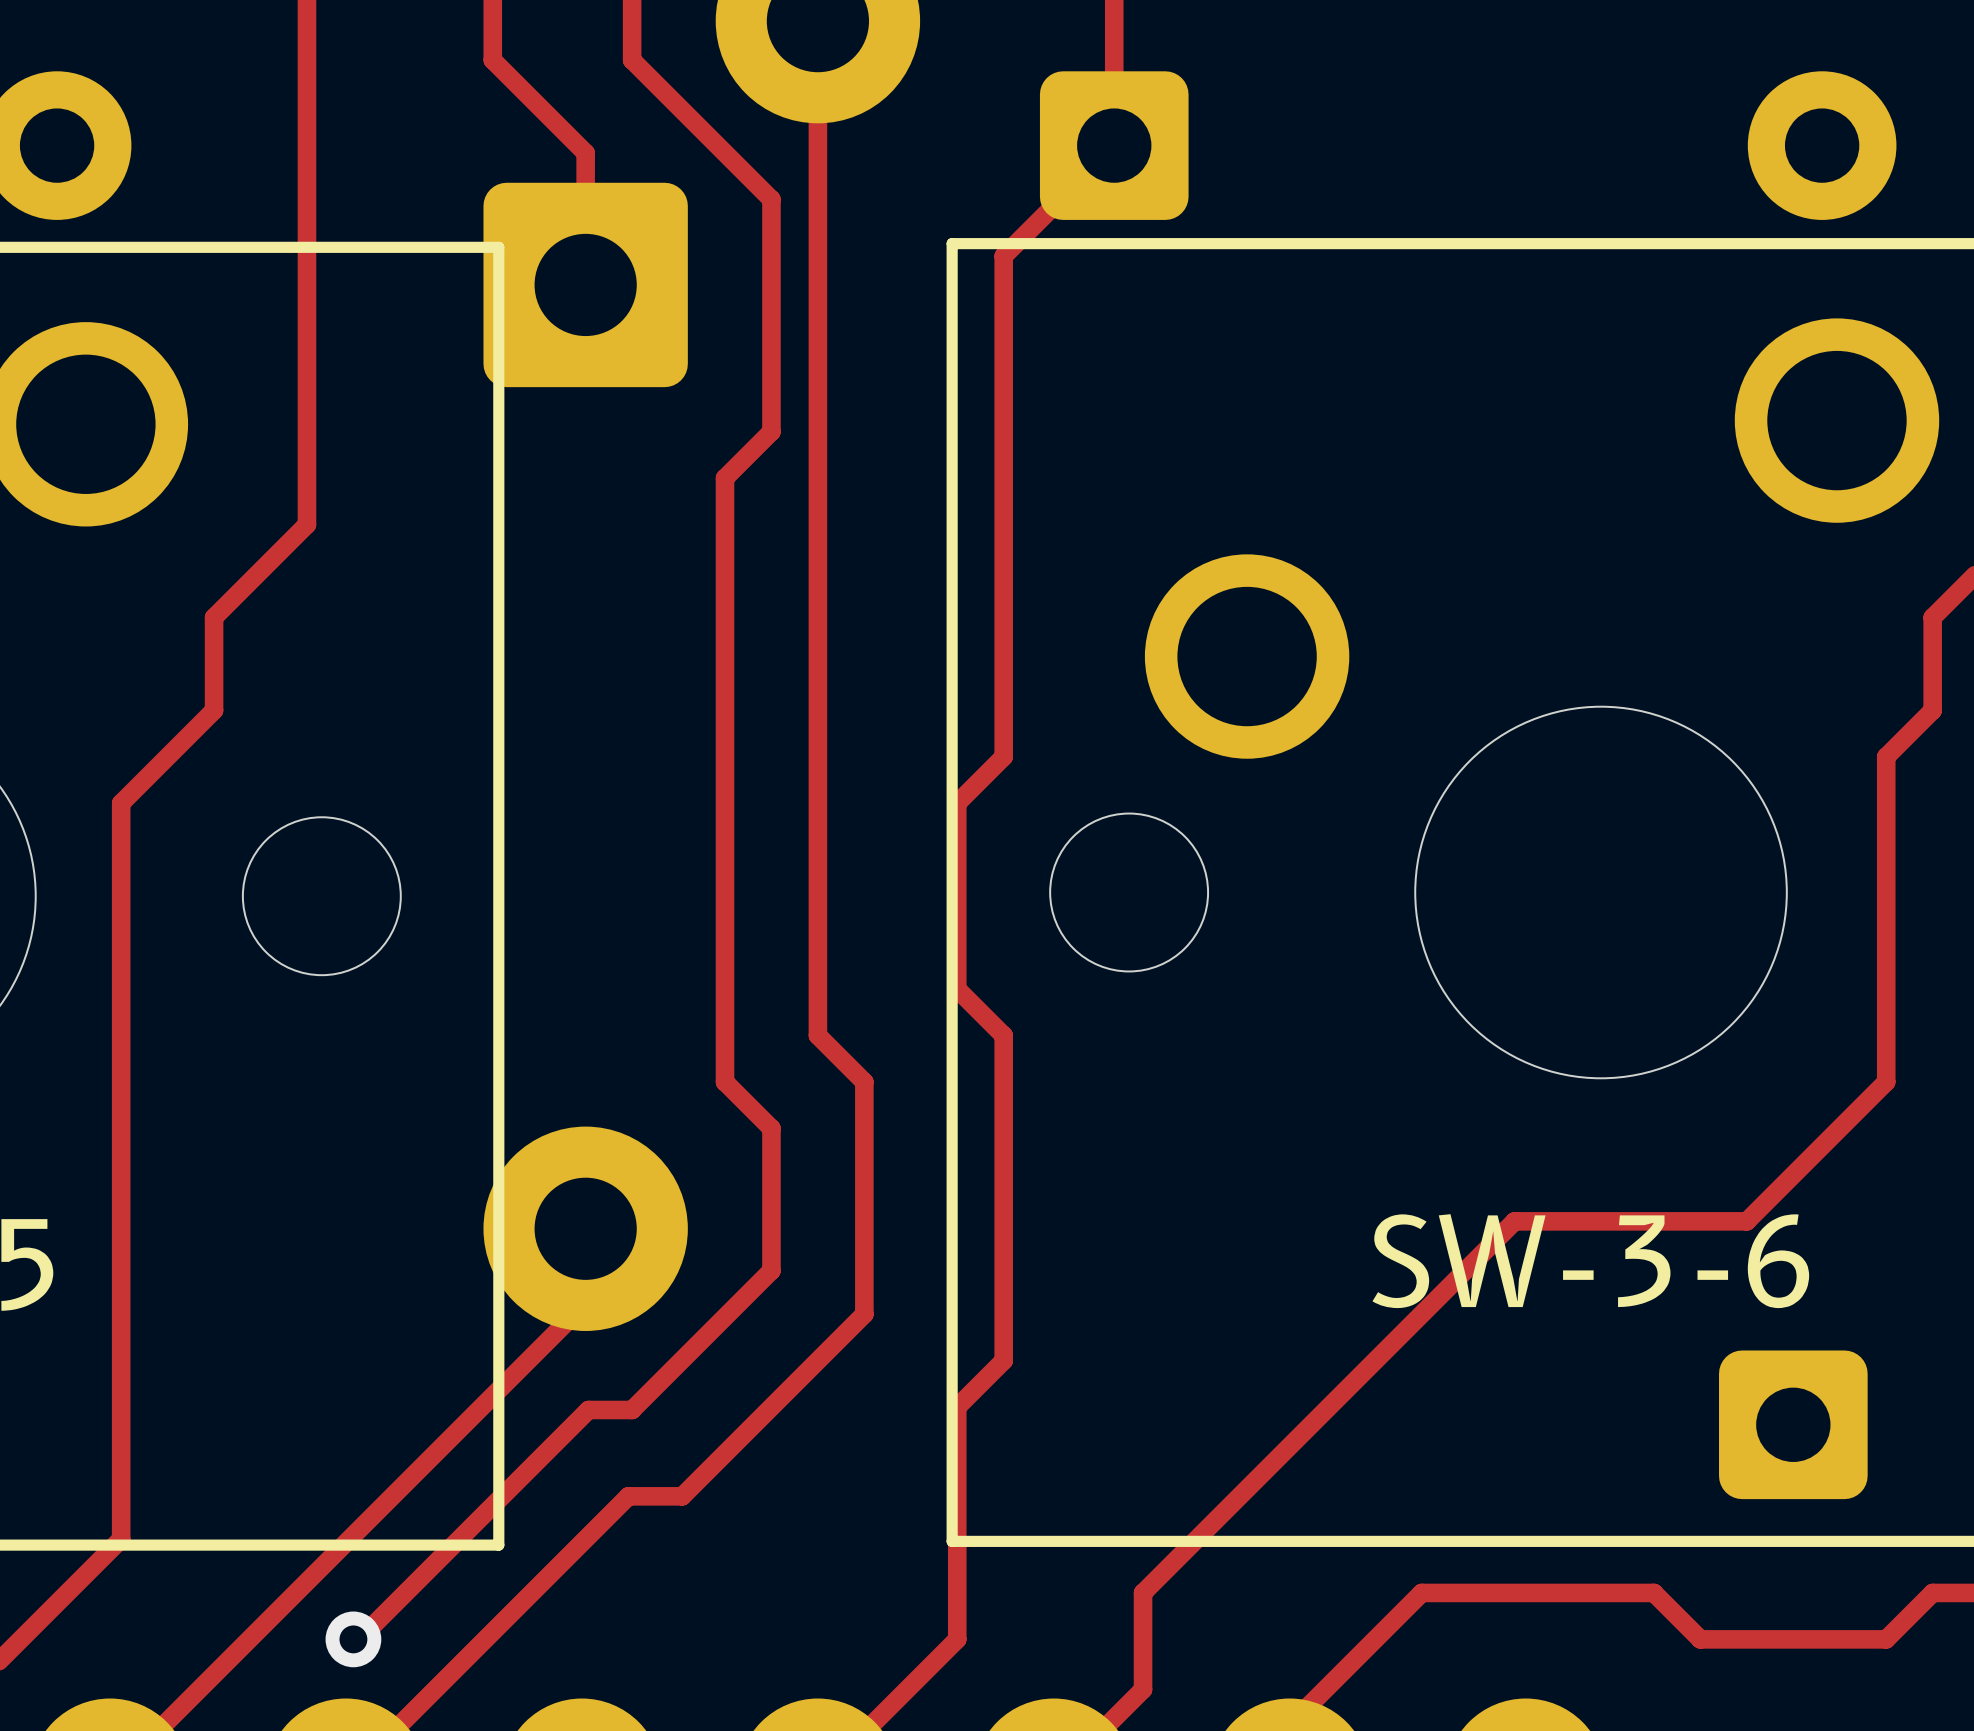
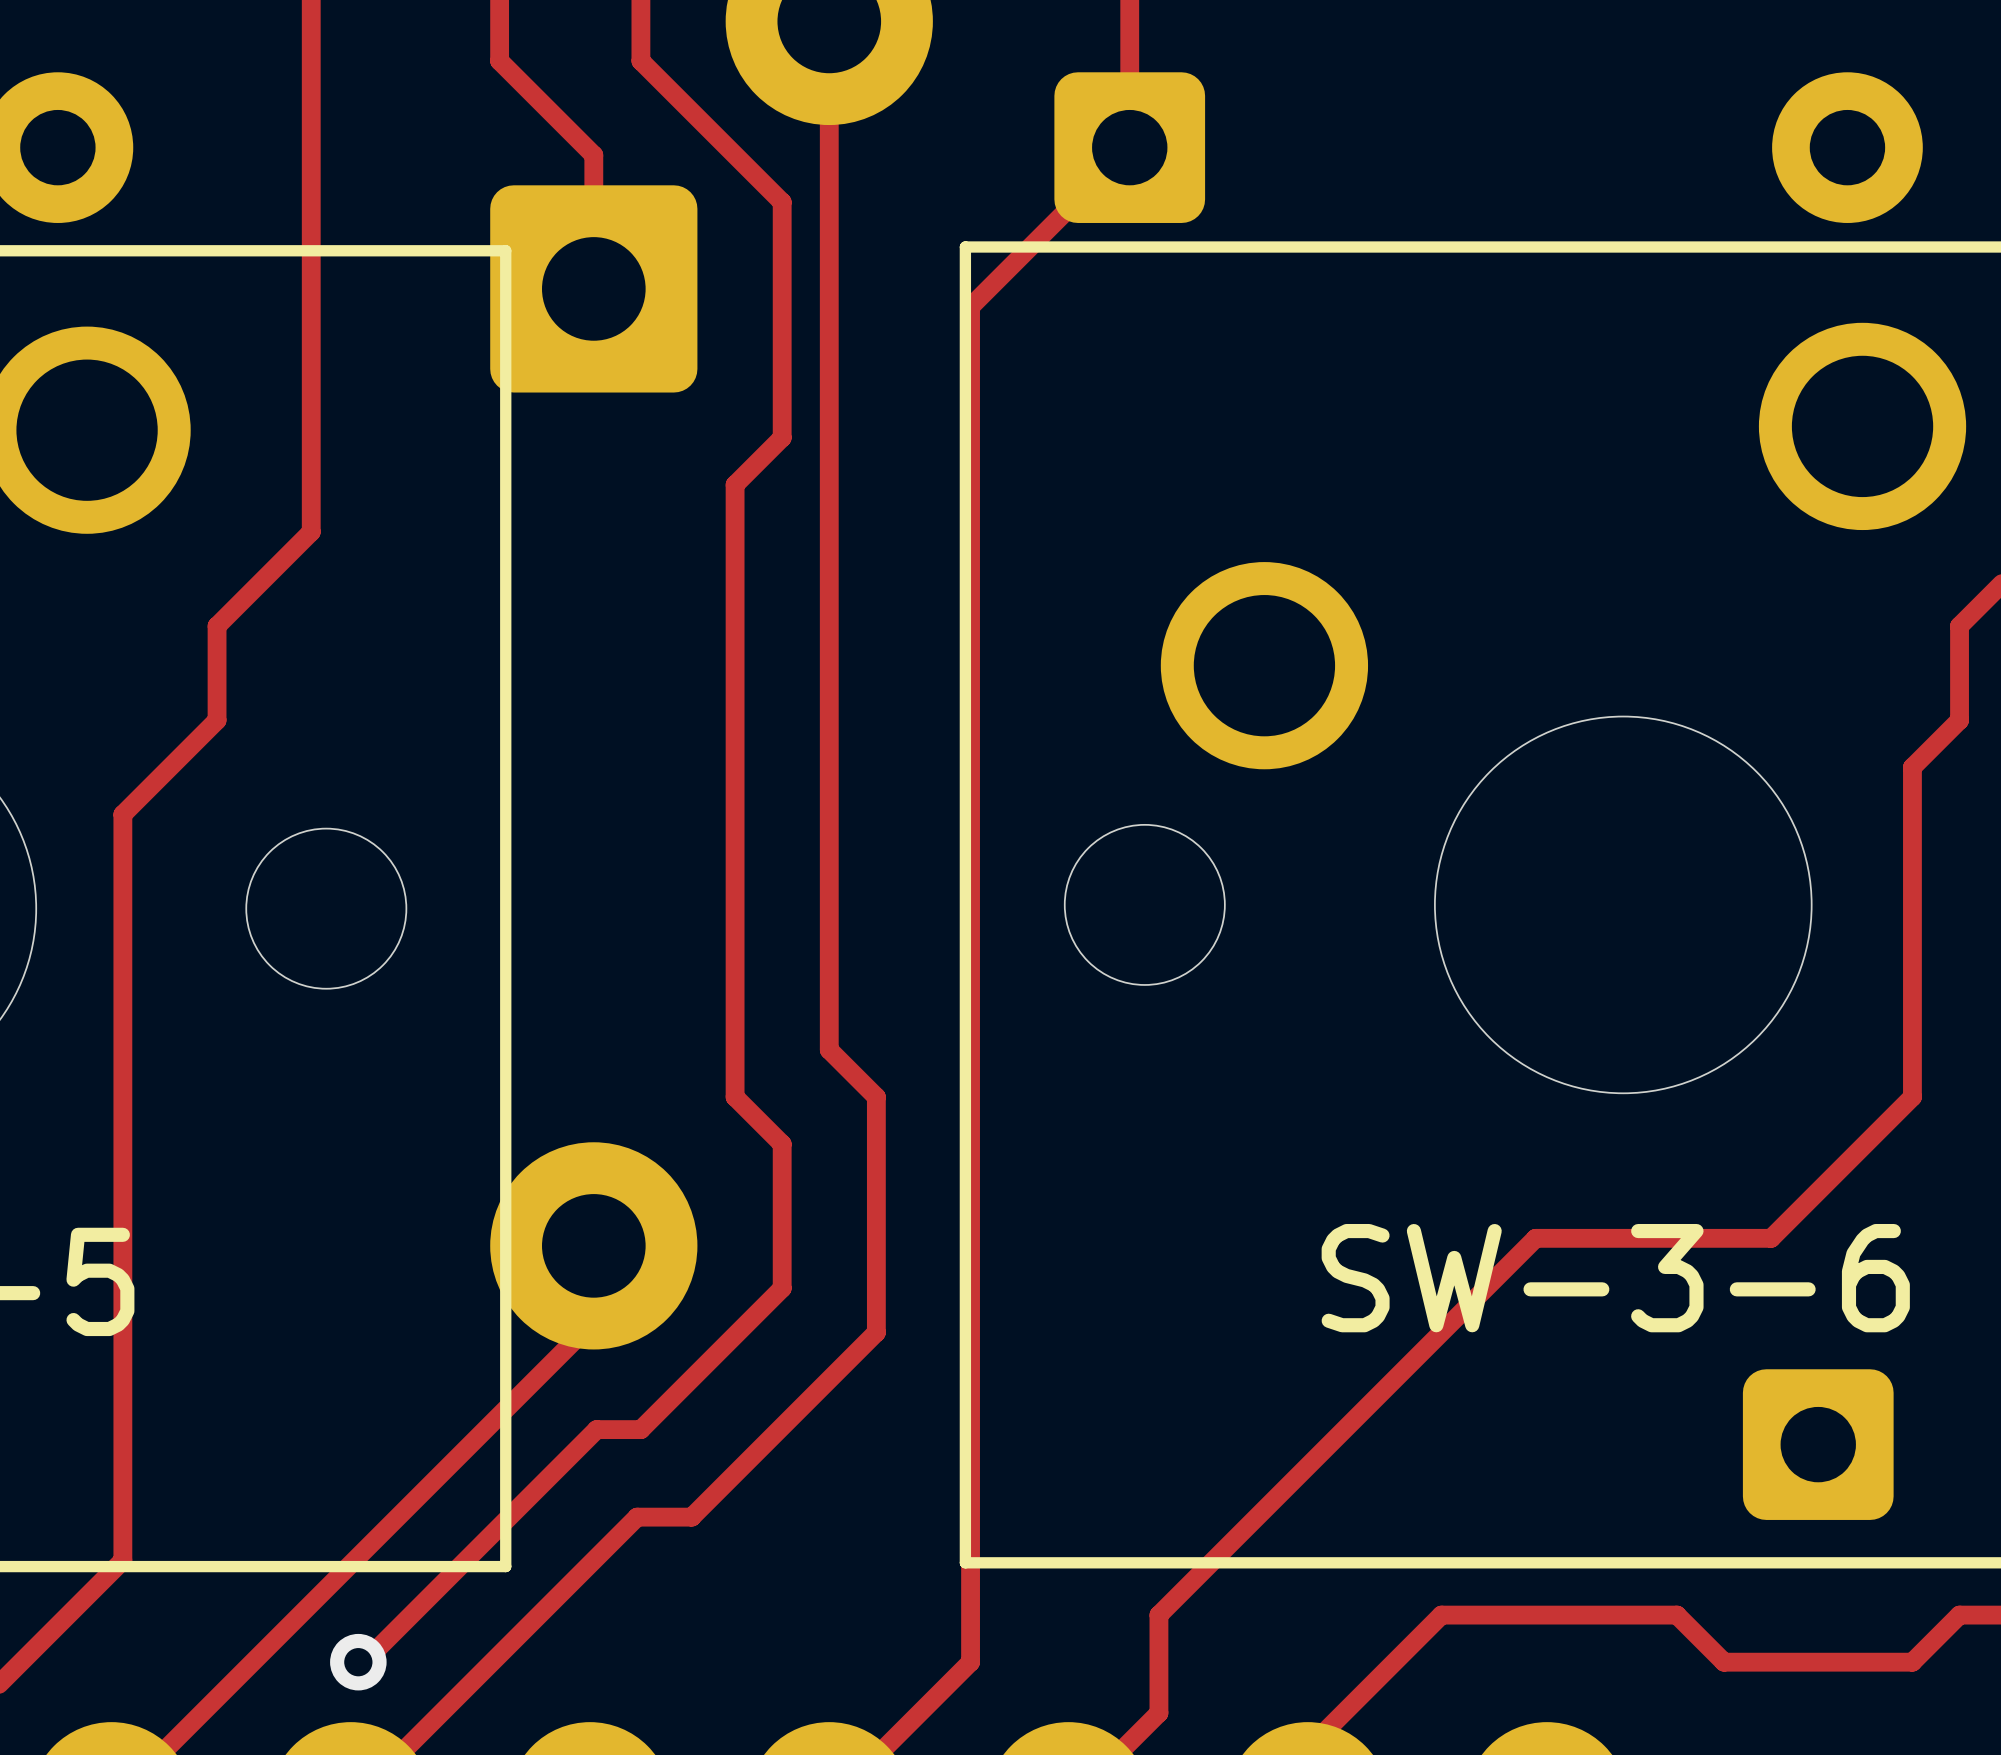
track: (1003, 256) (1003, 756) (957, 803) -> (1017, 259) (970, 306) (970, 814)
track: (957, 989) (1003, 1035) (1003, 1360) (957, 1407) -> (970, 1002) (970, 1426)

